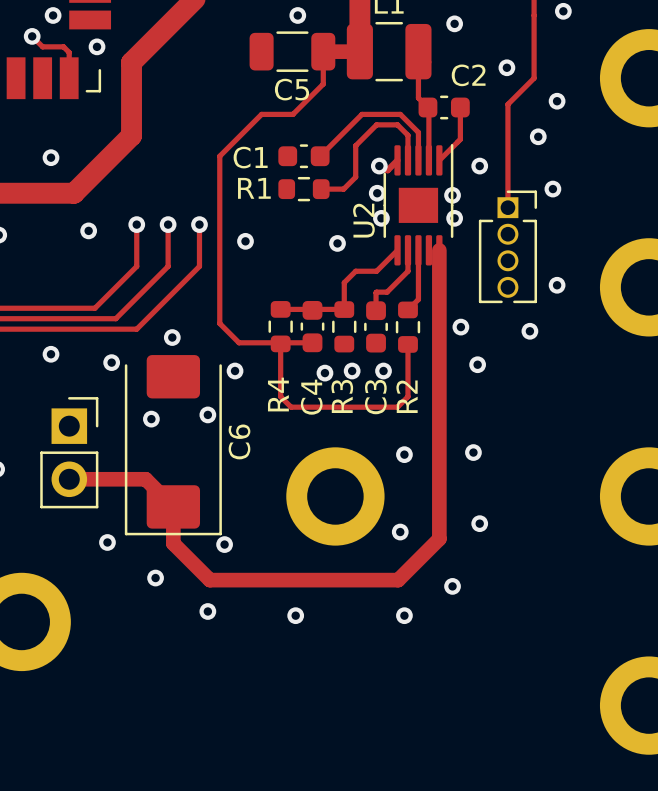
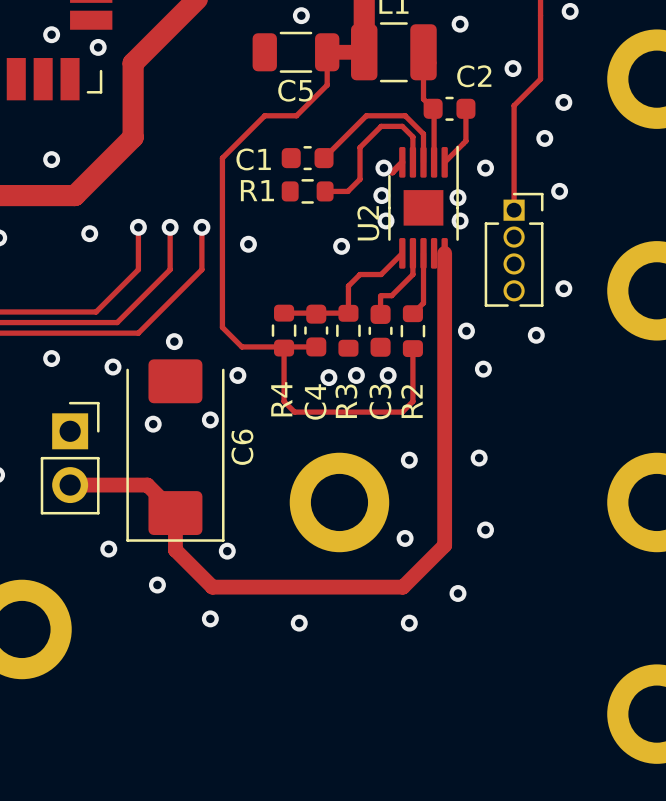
via: (53, 15) -> none
via: none -> (51, 34)
track: (32, 36) (42, 46) (63, 46) (69, 52) (69, 78) -> none
via: (32, 36) -> none

